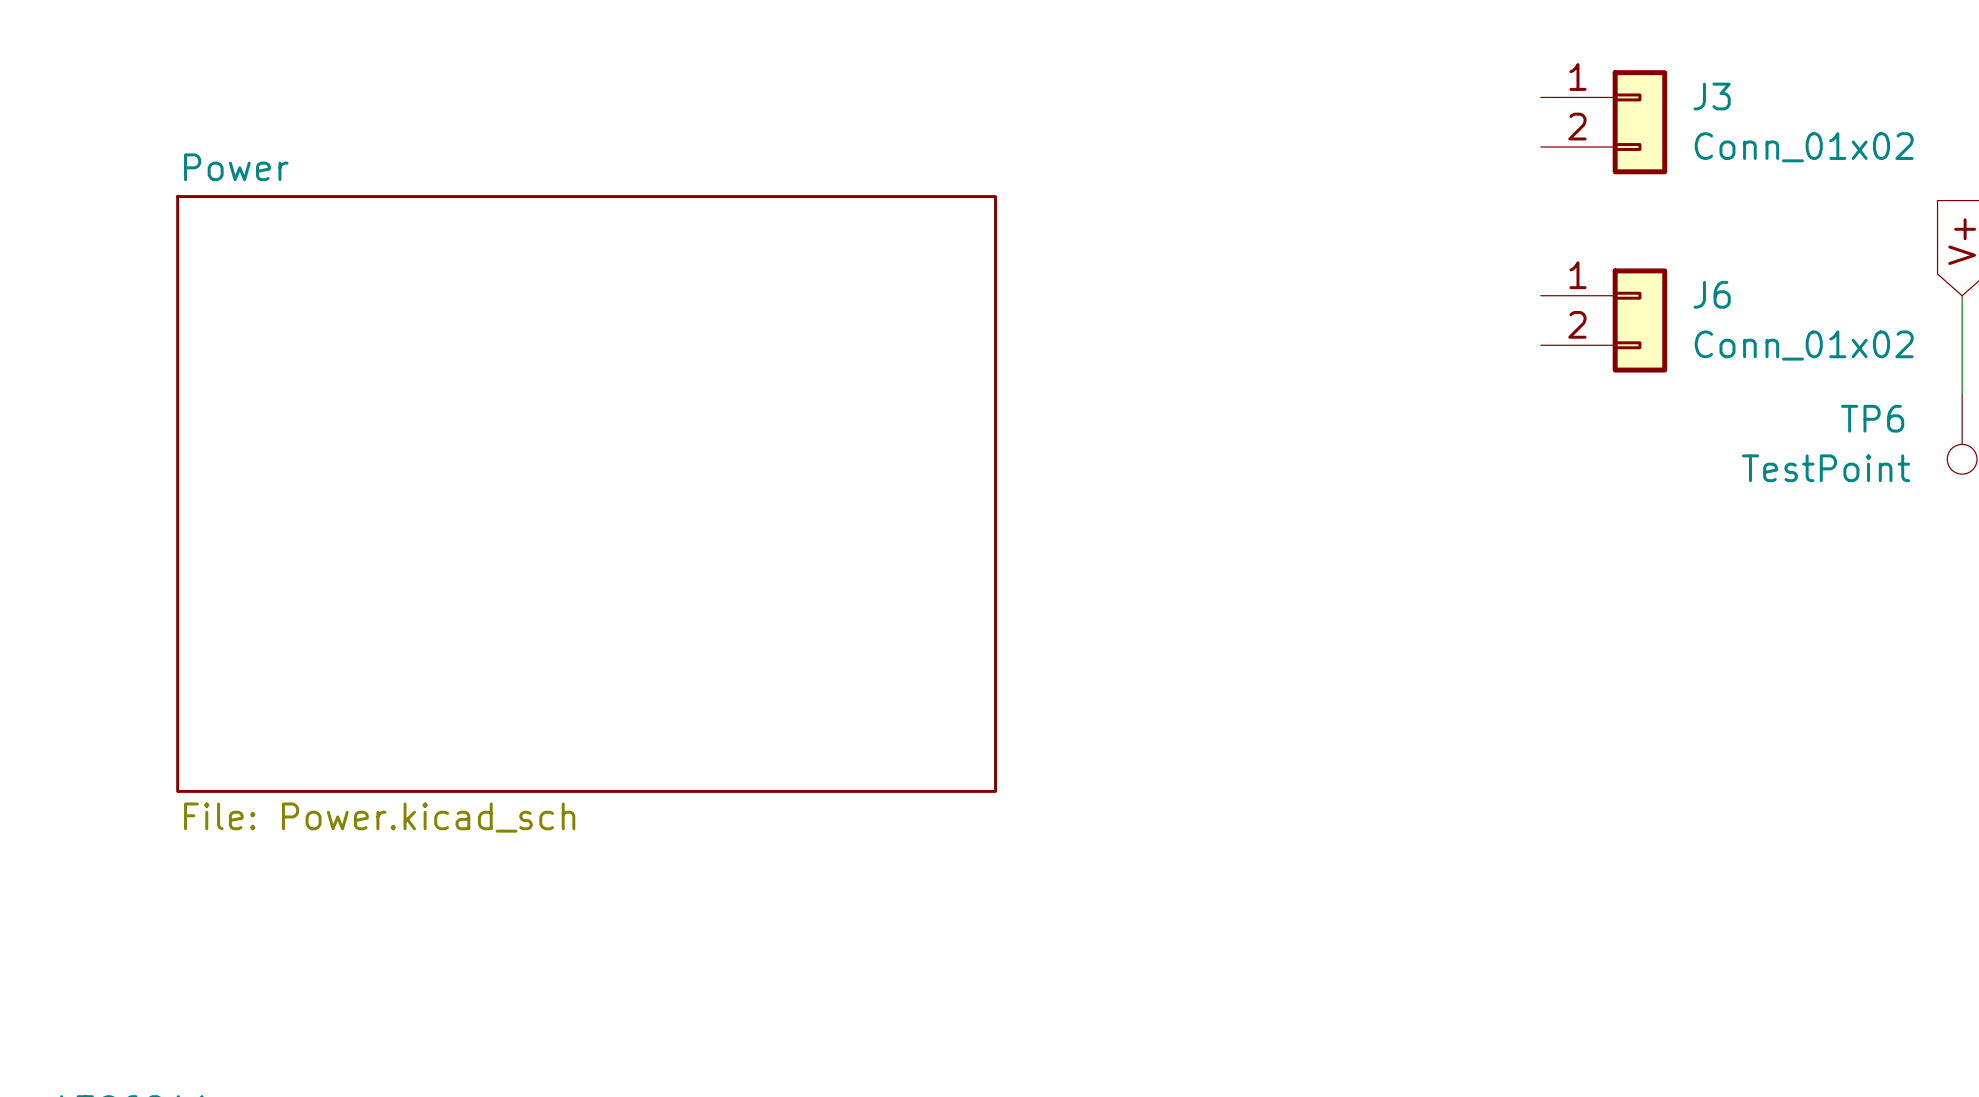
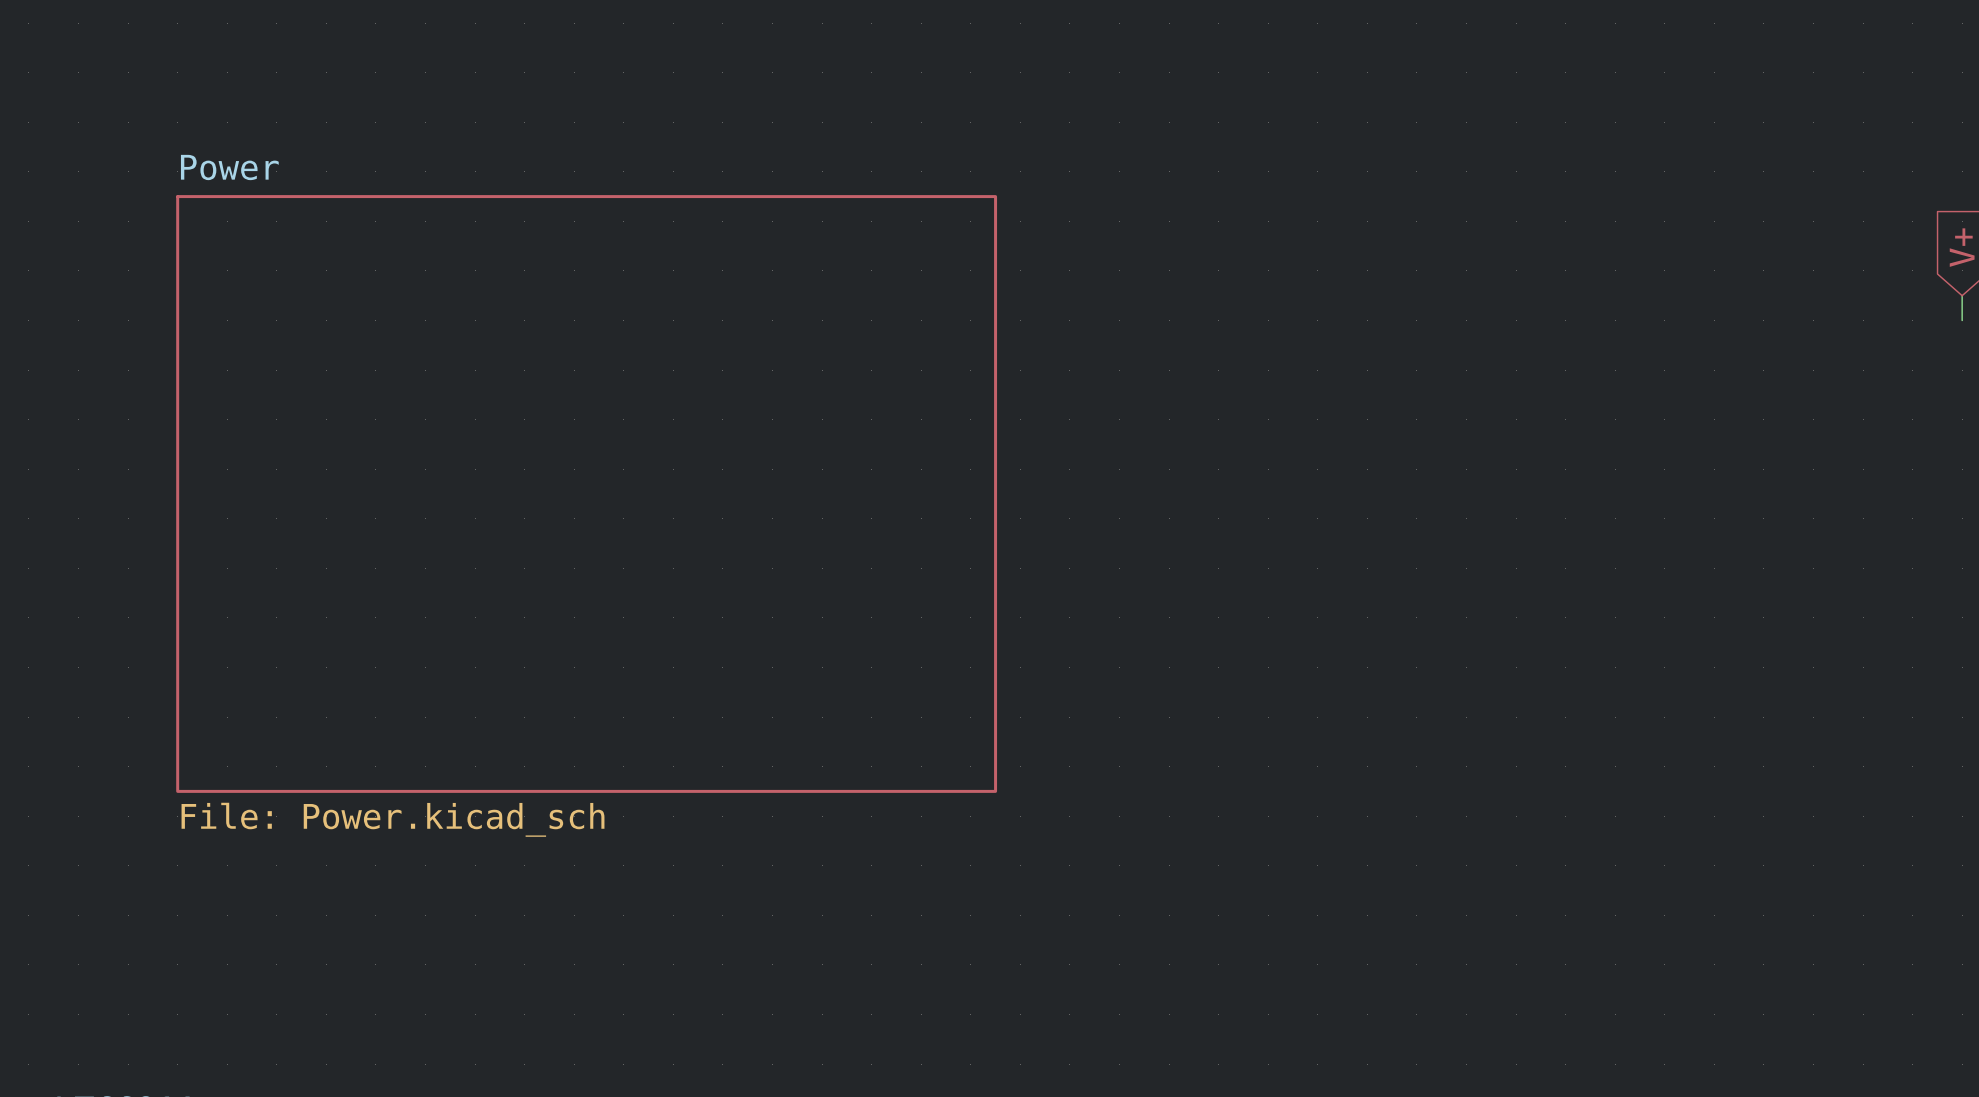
J3: Conn_01x02 (1604, 122) -> none
J6: Conn_01x02 (1604, 320) -> none
wire: (1962, 320) (1962, 394) -> none
TP6: TestPoint (1962, 434) -> none

